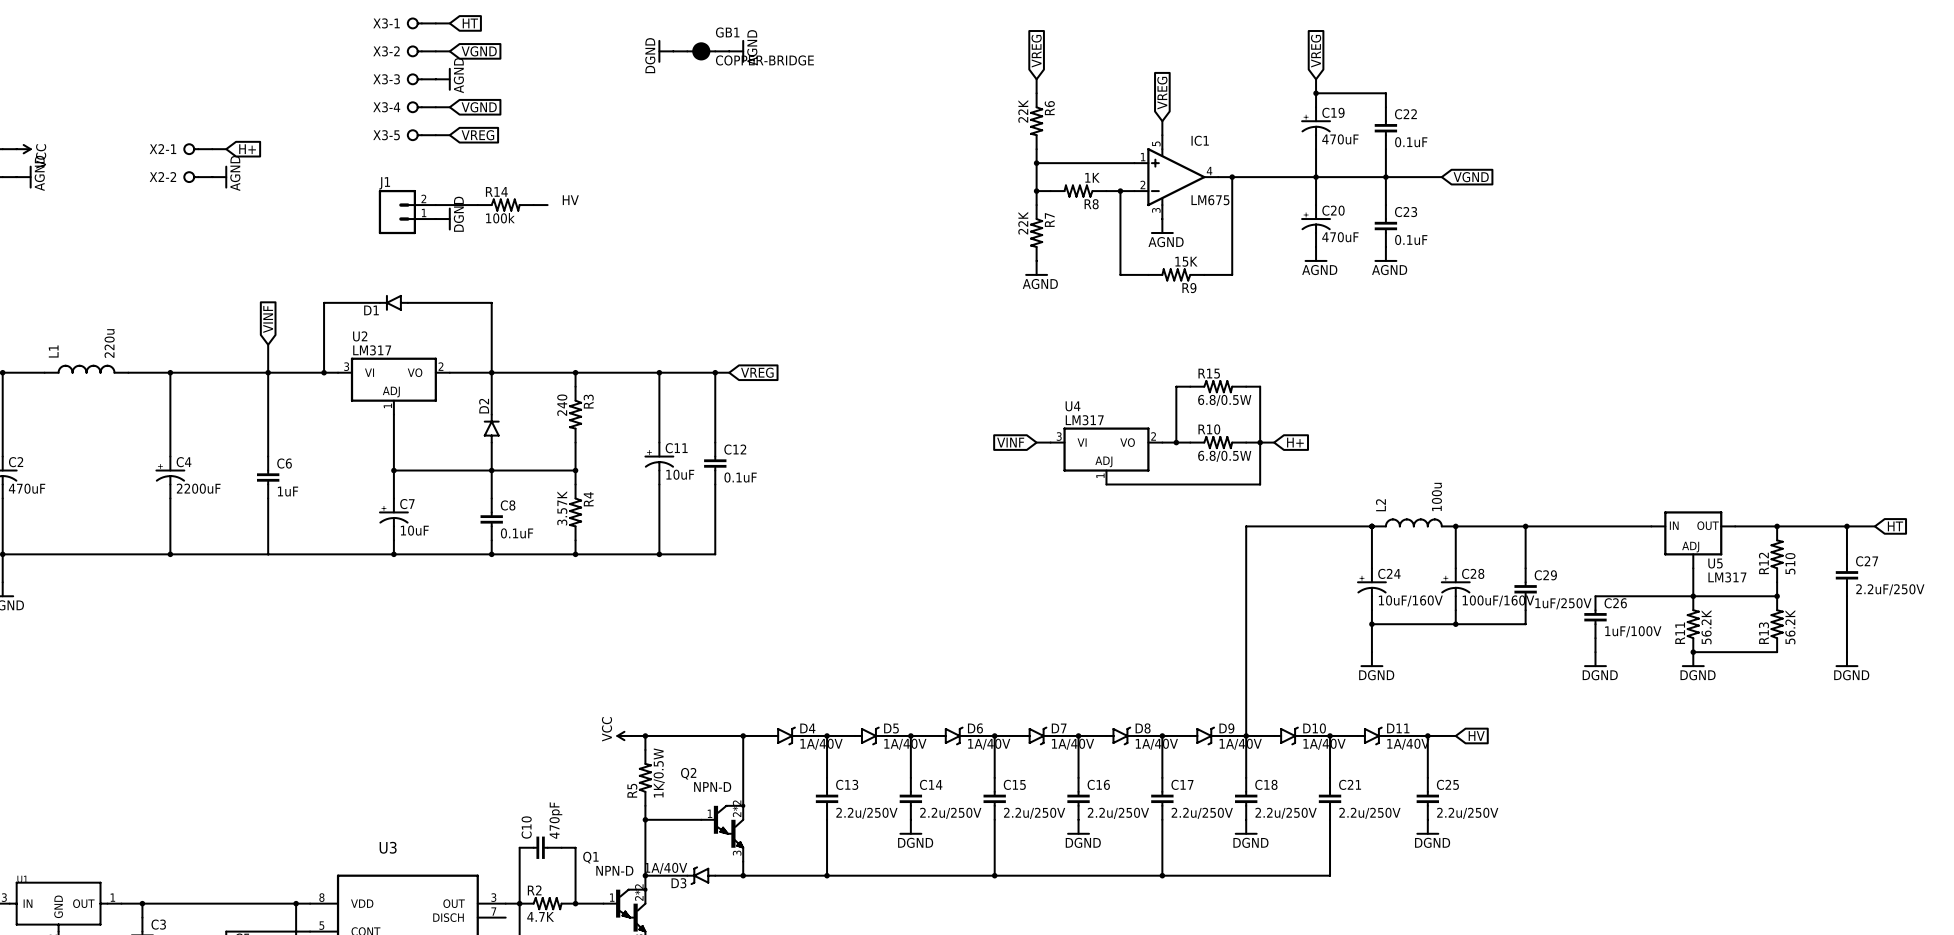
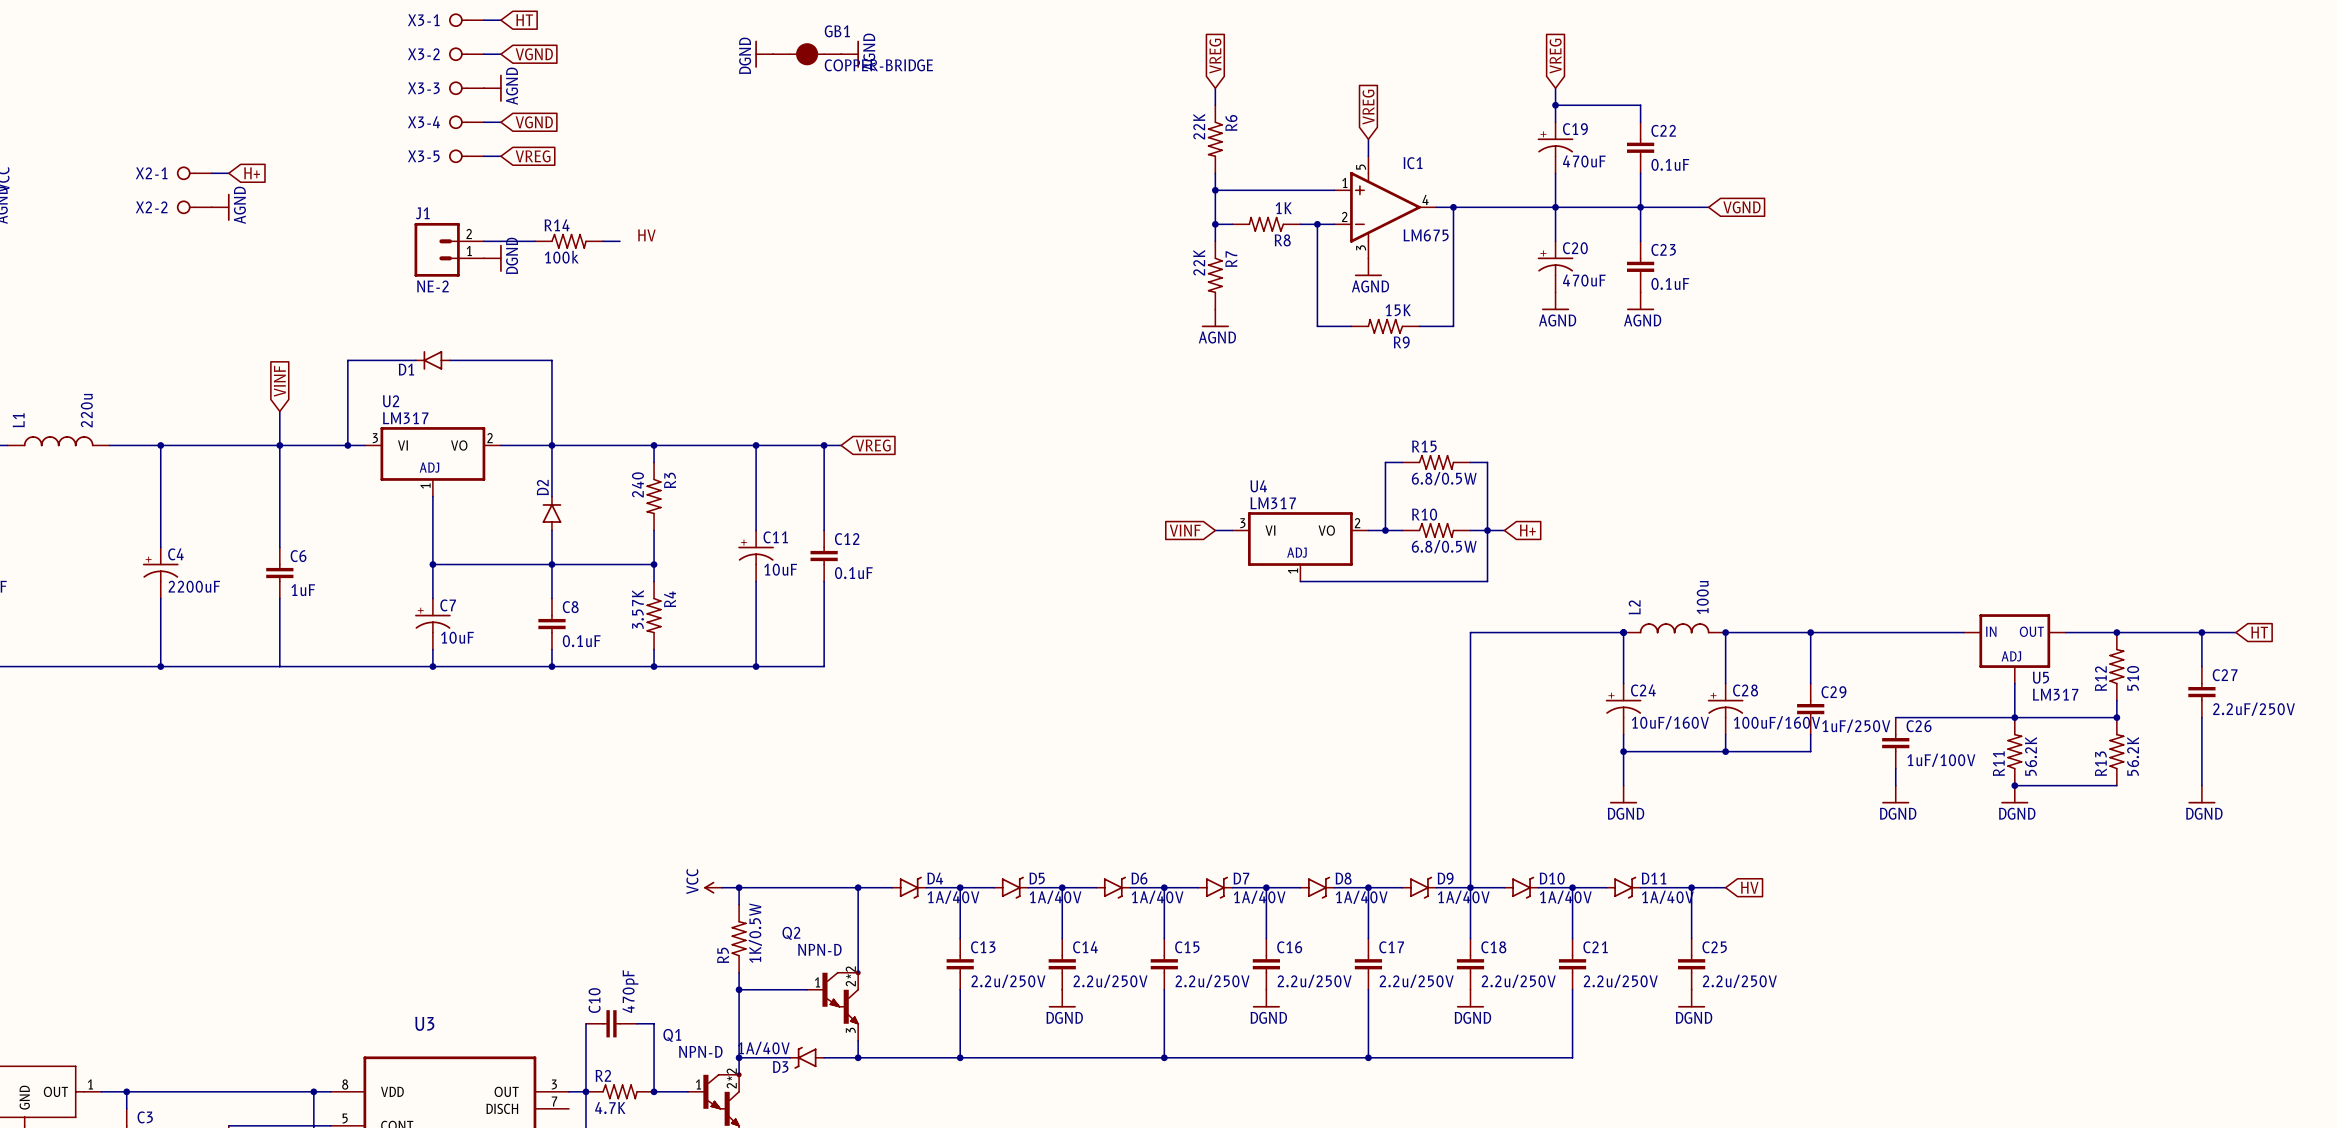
J1 value: none -> NE-2 (432, 286)

